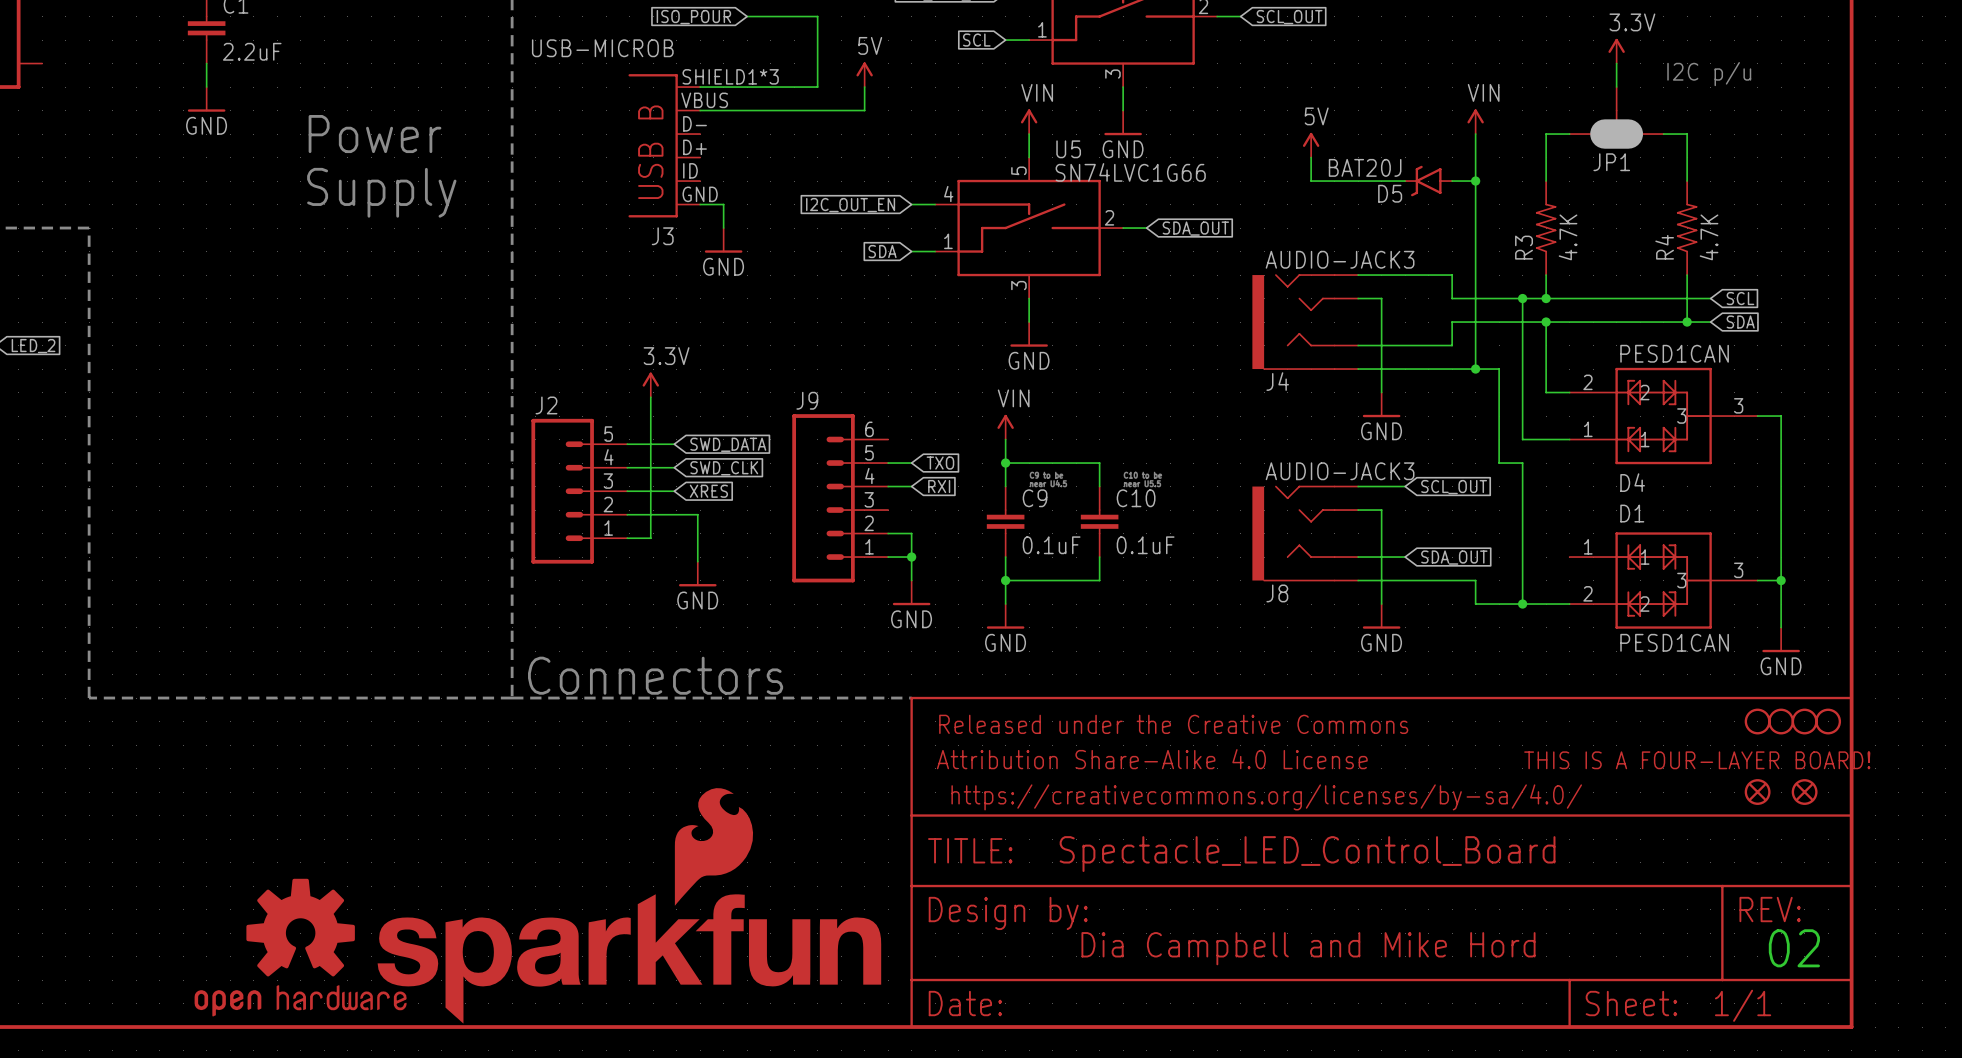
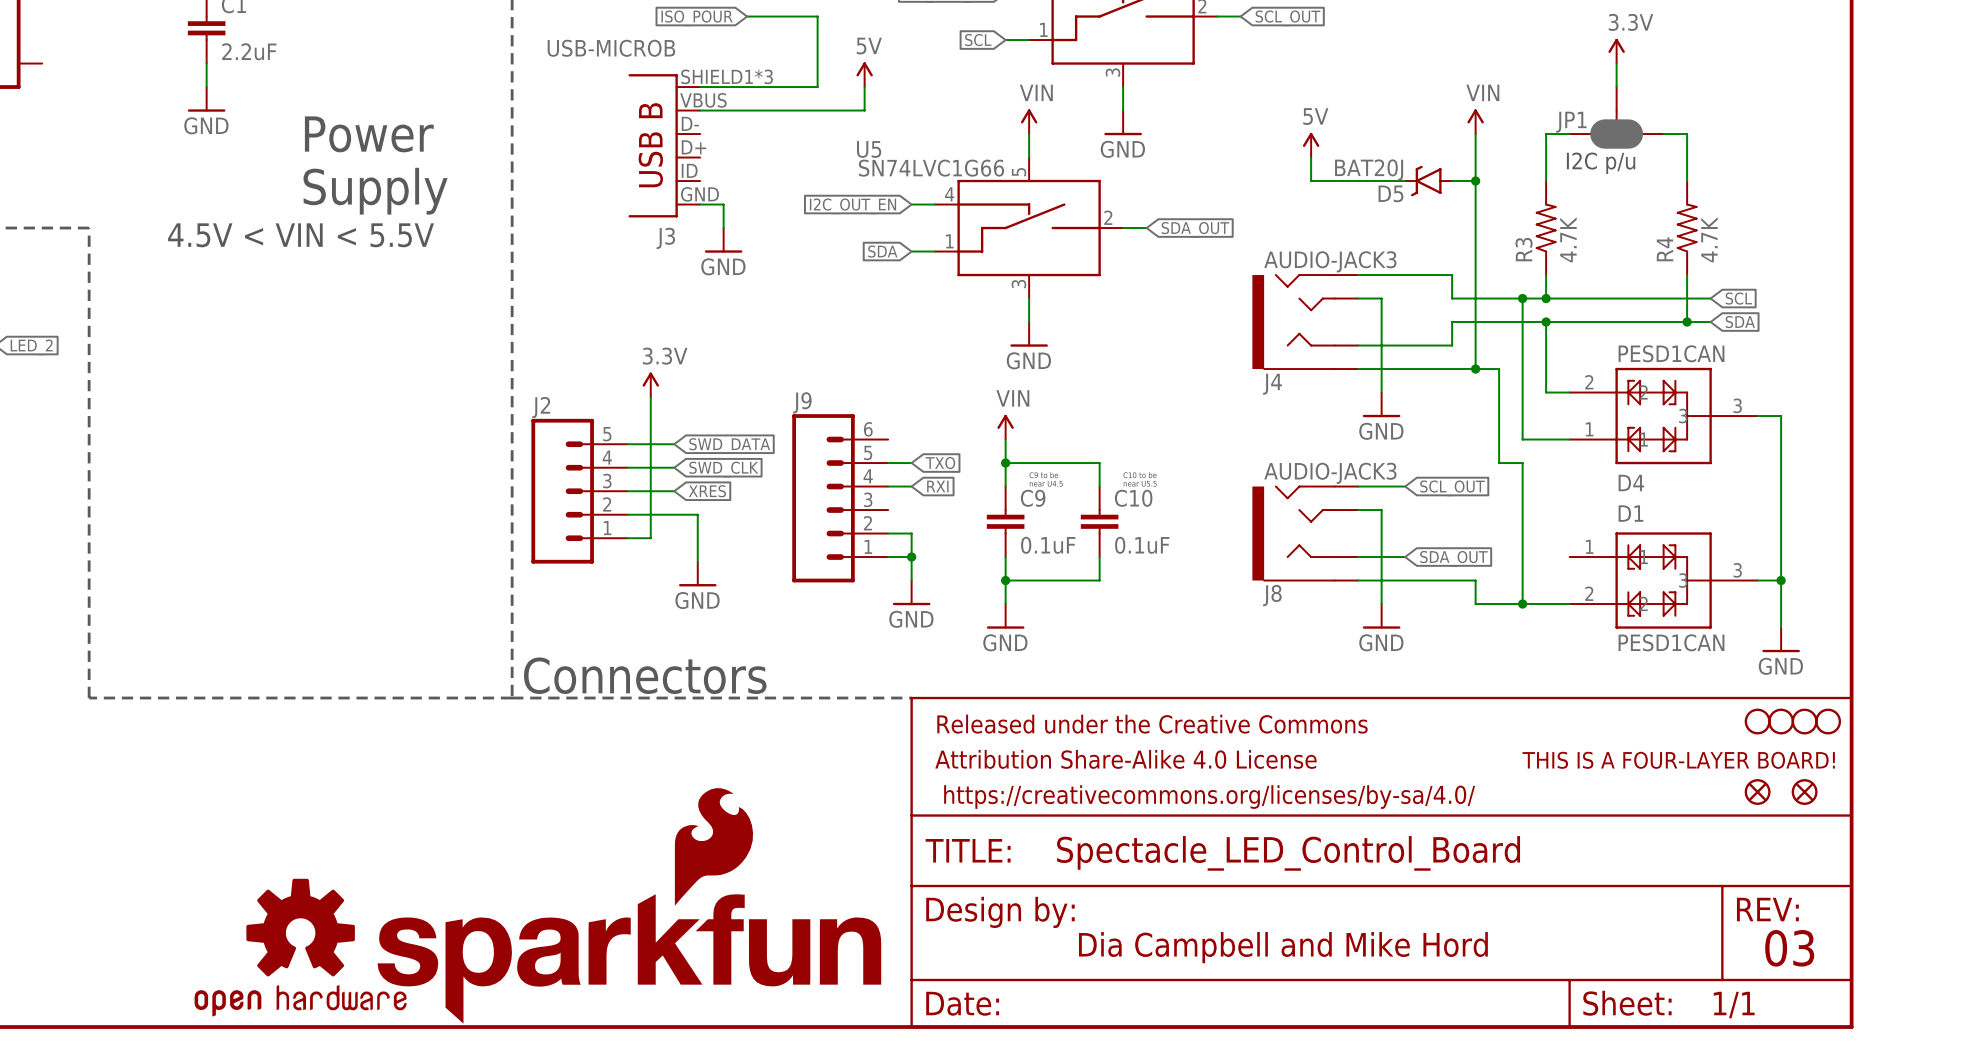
text position: I2C p/u (1709, 74) -> I2C p/u (1601, 163)
U5 name position: U5 (1068, 149) -> U5 (869, 149)
JP1 name position: JP1 (1611, 162) -> JP1 (1571, 122)
U5 value position: SN74LVC1G66 (1130, 172) -> SN74LVC1G66 (931, 168)
text: none -> 4.5V < VIN < 5.5V (301, 235)
text: 02 (1794, 948) -> 03 (1789, 948)

